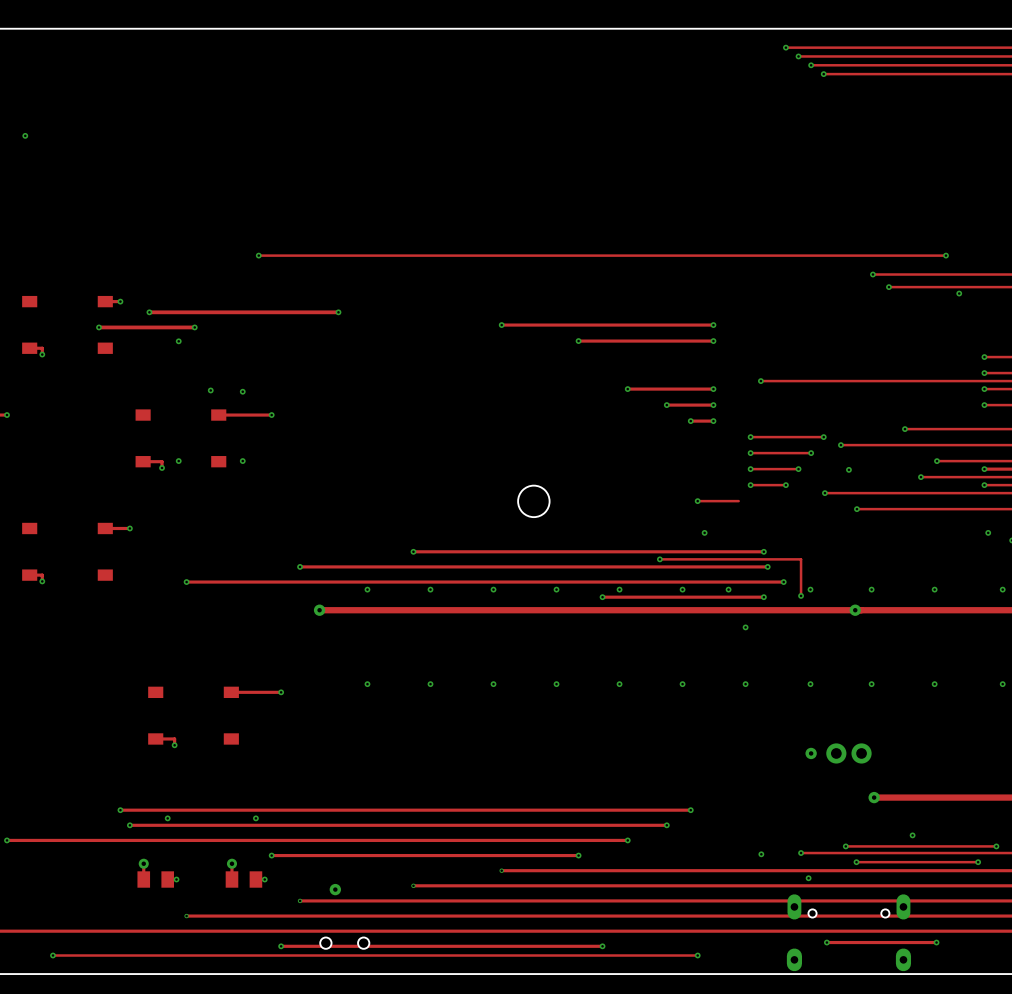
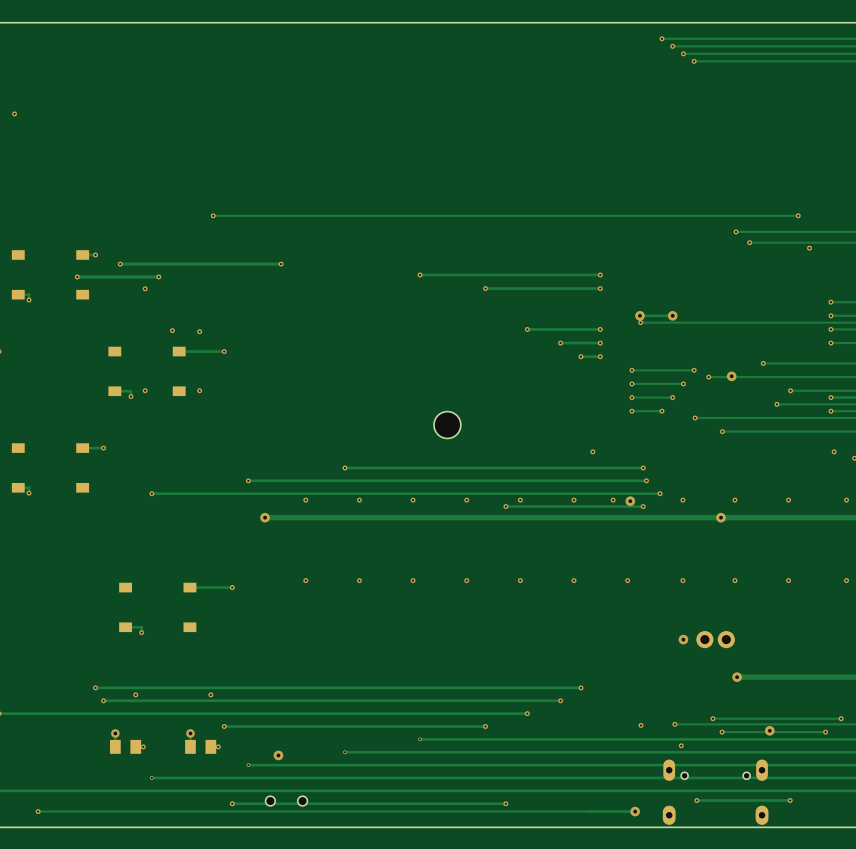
track: none -> (639, 315) (672, 315)
via: none -> (639, 315)
via: none -> (672, 315)
via: none -> (731, 376)
via: (848, 469) -> none
track: (697, 501) (738, 501) -> none
via: (697, 501) -> none
track: (659, 559) (801, 559) (801, 595) -> none
via: (659, 559) -> none
via: none -> (630, 501)
via: (801, 595) -> none
via: (745, 627) -> none
via: (912, 835) -> none
via: none -> (769, 730)
track: none -> (586, 811) (635, 811)
via: (697, 955) -> none
via: none -> (635, 811)

